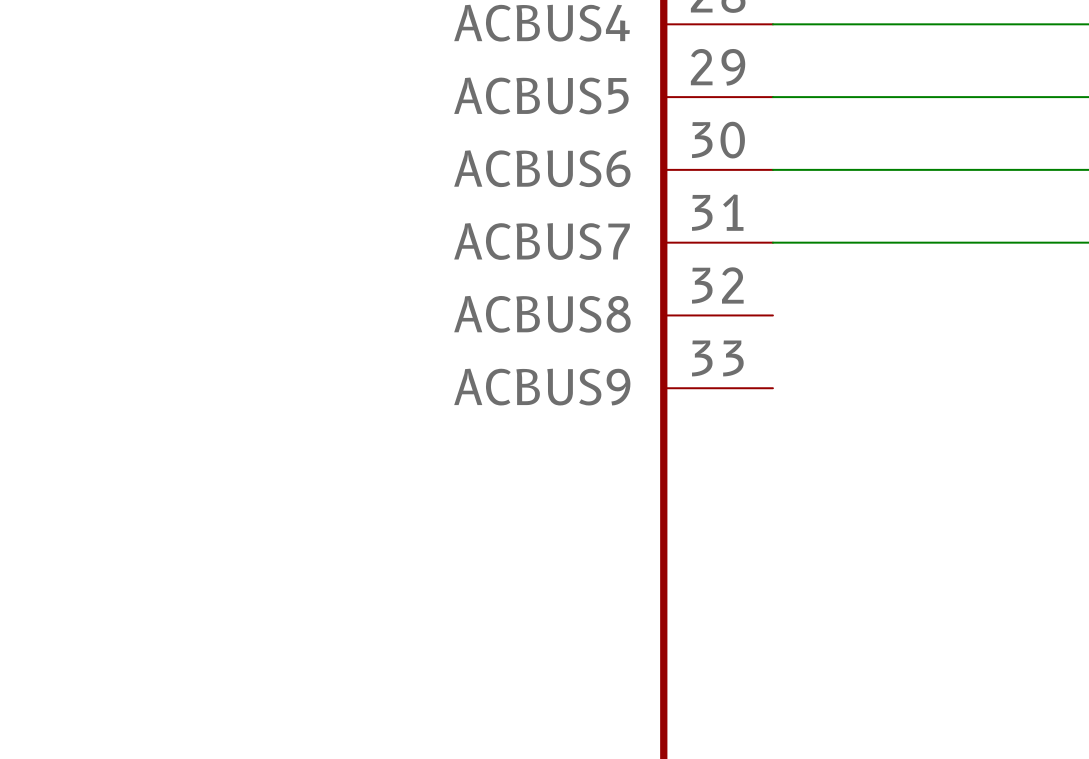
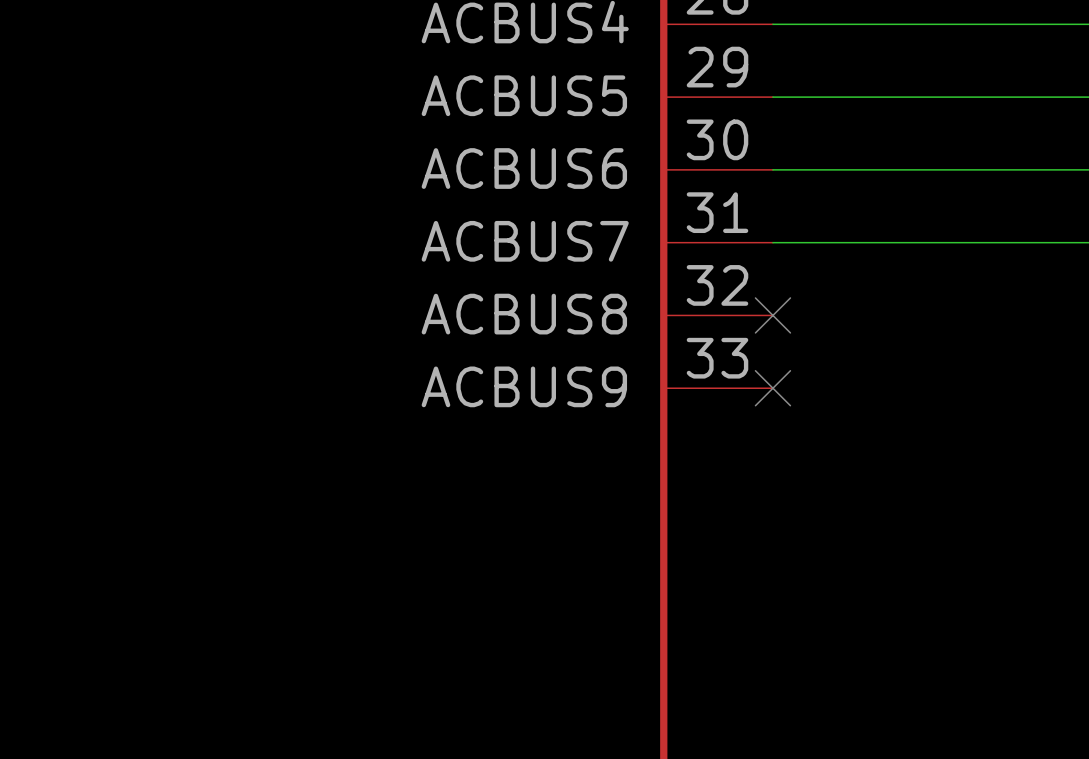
no-connect mark: none -> (772, 315)
no-connect mark: none -> (772, 388)

